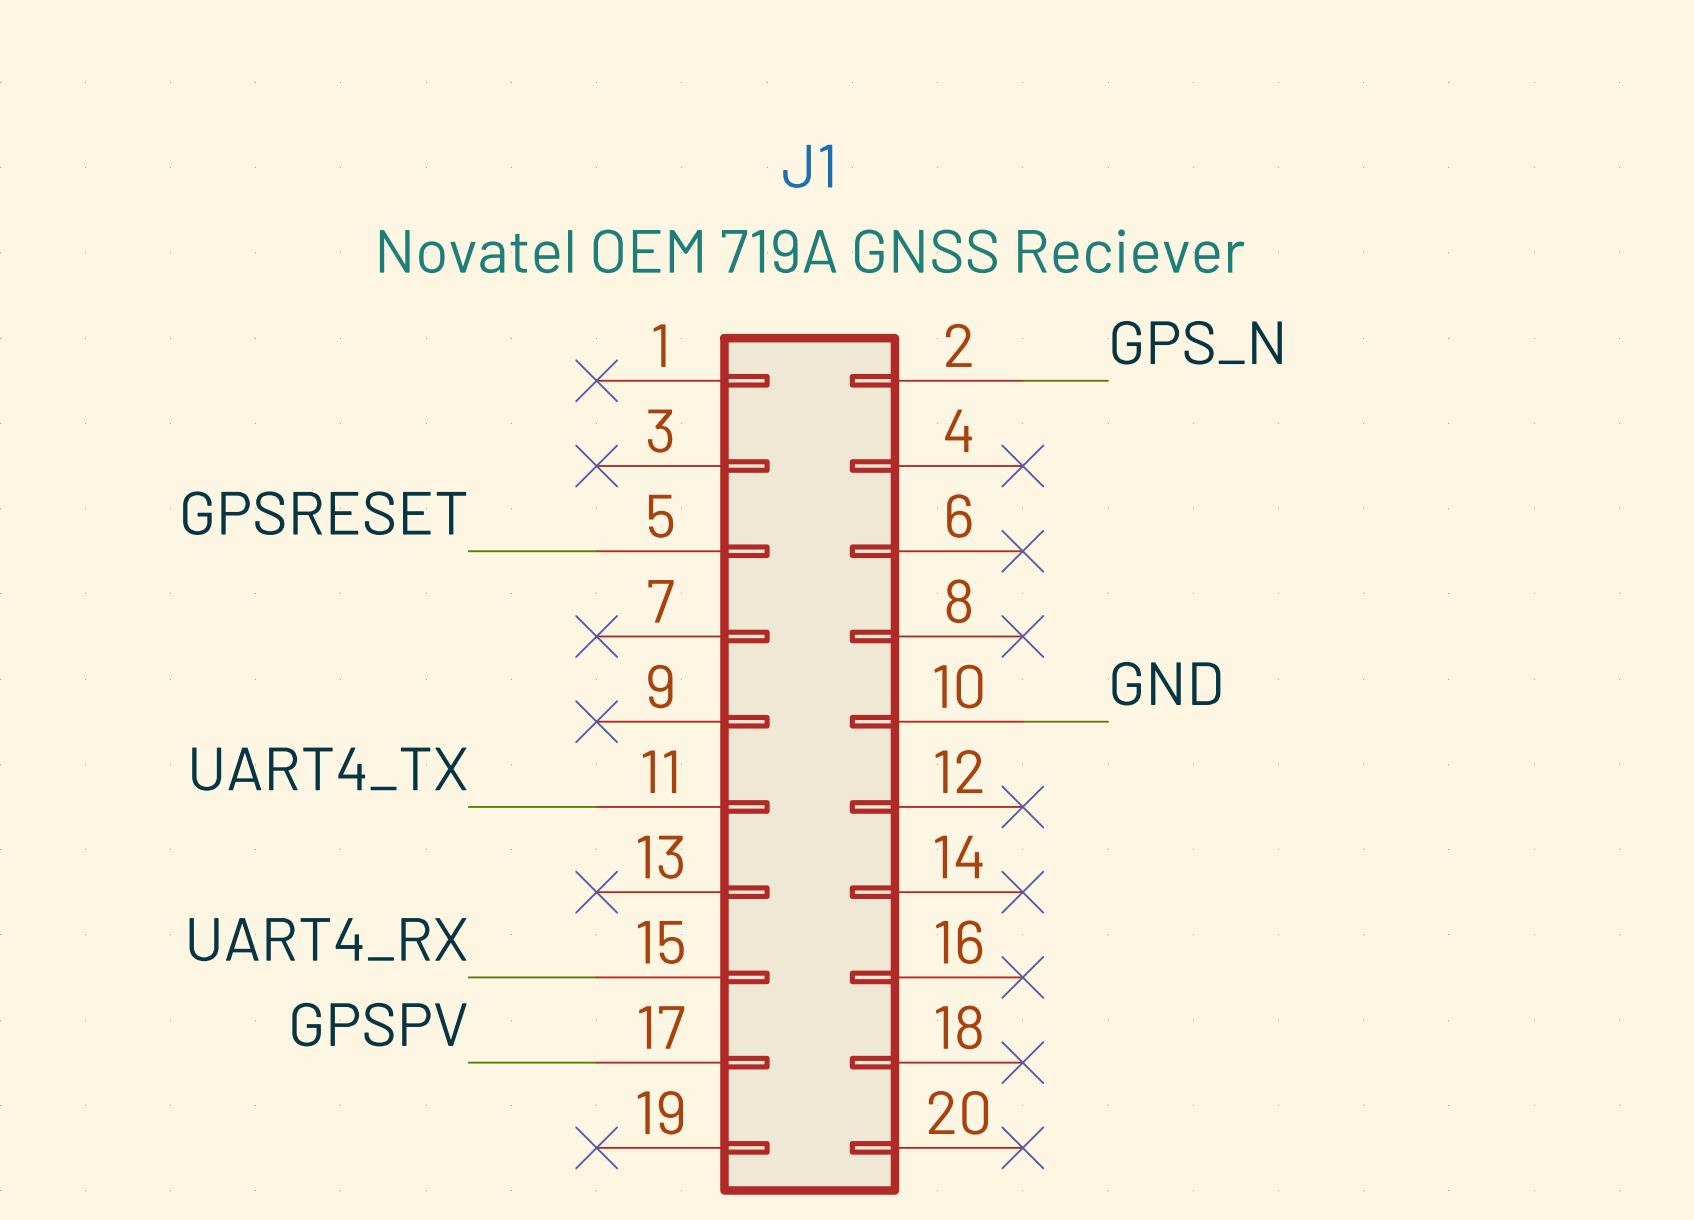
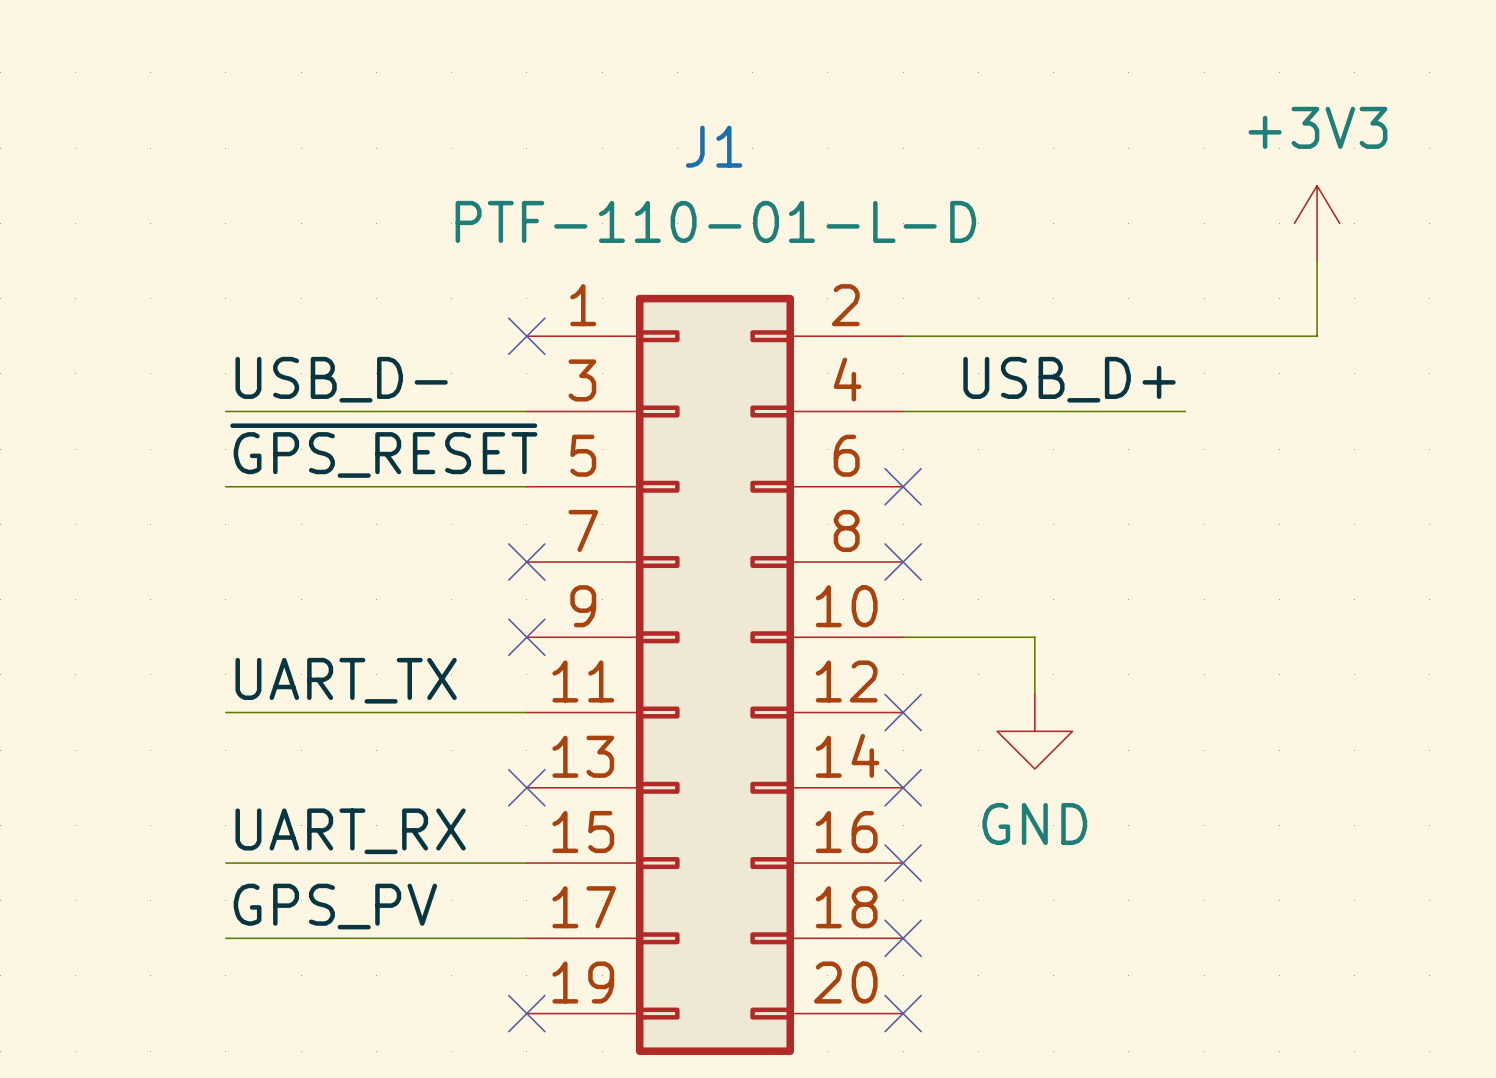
J1 value: Novatel OEM 719A GNSS Reciever (812, 251) -> PTF-110-01-L-D (715, 221)
power symbol: none -> +3V3 (1317, 223)
wire: none -> (1317, 260) (1317, 336) (978, 336)
label: GPS_N (1197, 342) -> none
label: none -> USB_D- (341, 379)
label: none -> USB_D+ (1069, 379)
wire: none -> (225, 411) (526, 411)
no-connect mark: (596, 466) -> none
wire: none -> (903, 411) (1185, 411)
no-connect mark: (1022, 466) -> none
label: GPSRESET (324, 513) -> ~{GPS_RESET} (383, 450)
wire: none -> (225, 486) (413, 486)
label: GND (1166, 683) -> none
wire: none -> (978, 637) (1034, 637) (1034, 693)
label: UART4_TX (329, 769) -> UART_TX (346, 680)
wire: none -> (225, 712) (413, 712)
power symbol: none -> GND (1034, 731)
label: UART4_RX (328, 939) -> UART_RX (350, 831)
wire: none -> (225, 863) (413, 863)
label: GPSPV (379, 1024) -> GPS_PV (335, 906)
wire: none -> (225, 938) (413, 938)

